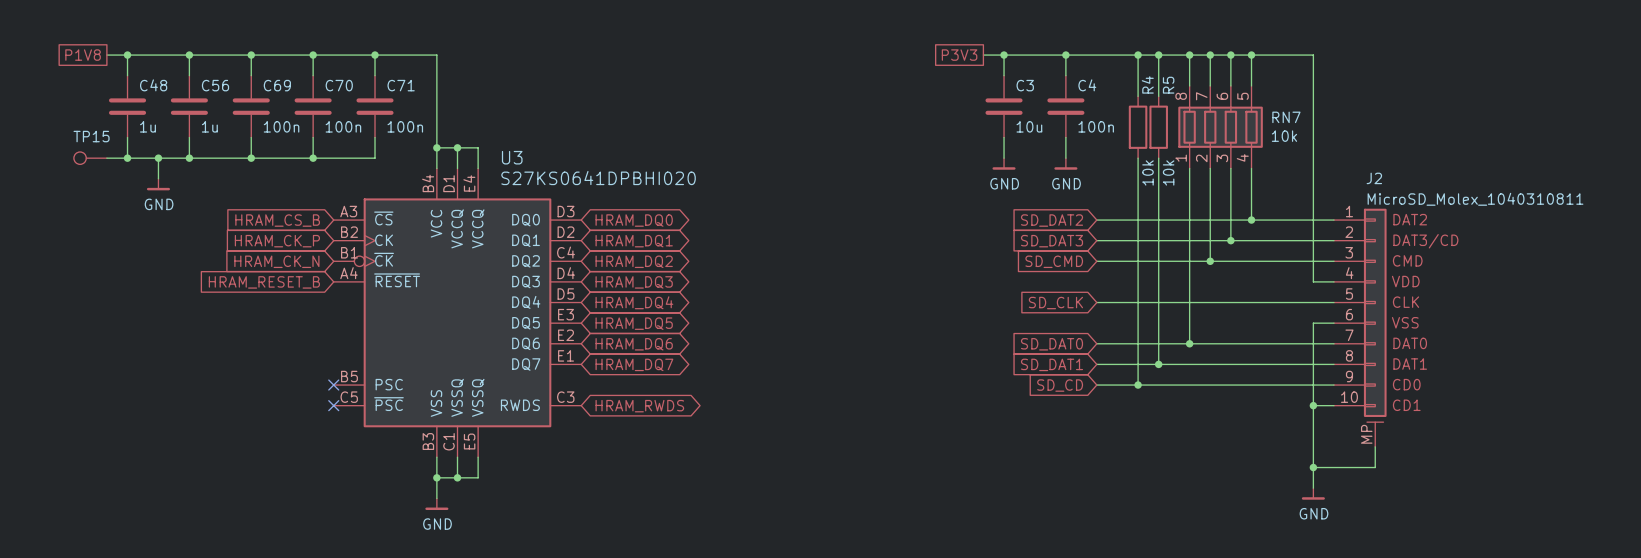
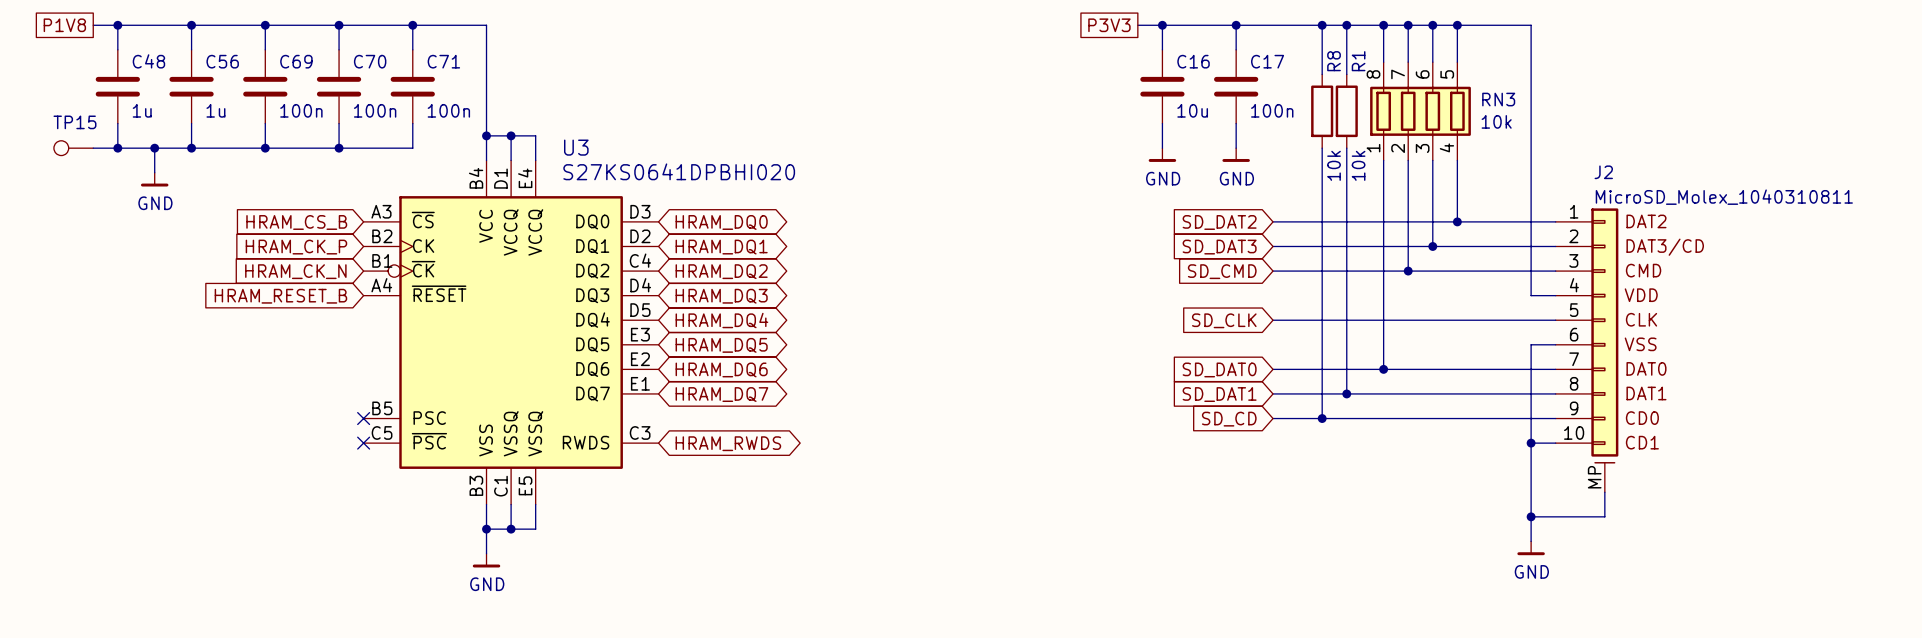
R4 name: R4 (1147, 84) -> R8 (1334, 61)
C3 name: C3 (1025, 85) -> C16 (1193, 61)
C4 name: C4 (1087, 85) -> C17 (1267, 61)
R5 name: R5 (1168, 85) -> R1 (1358, 61)
RN7 name: RN7 (1286, 117) -> RN3 (1498, 99)

